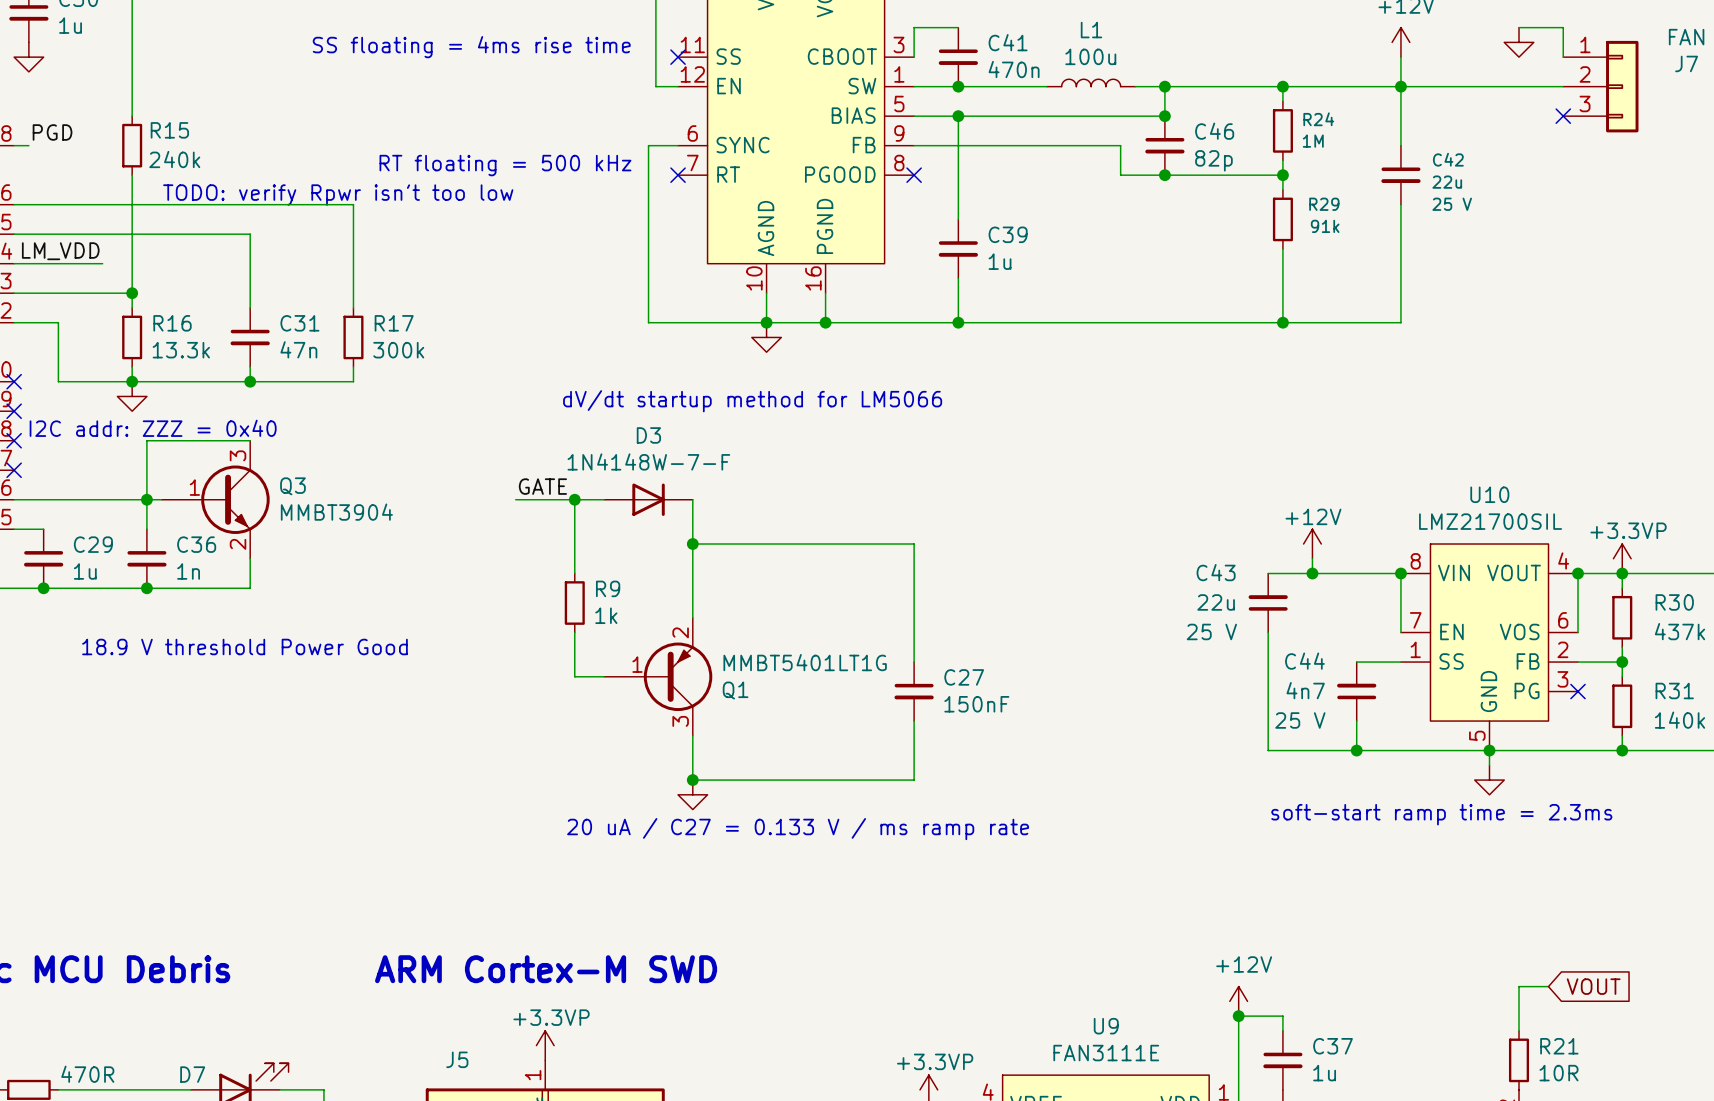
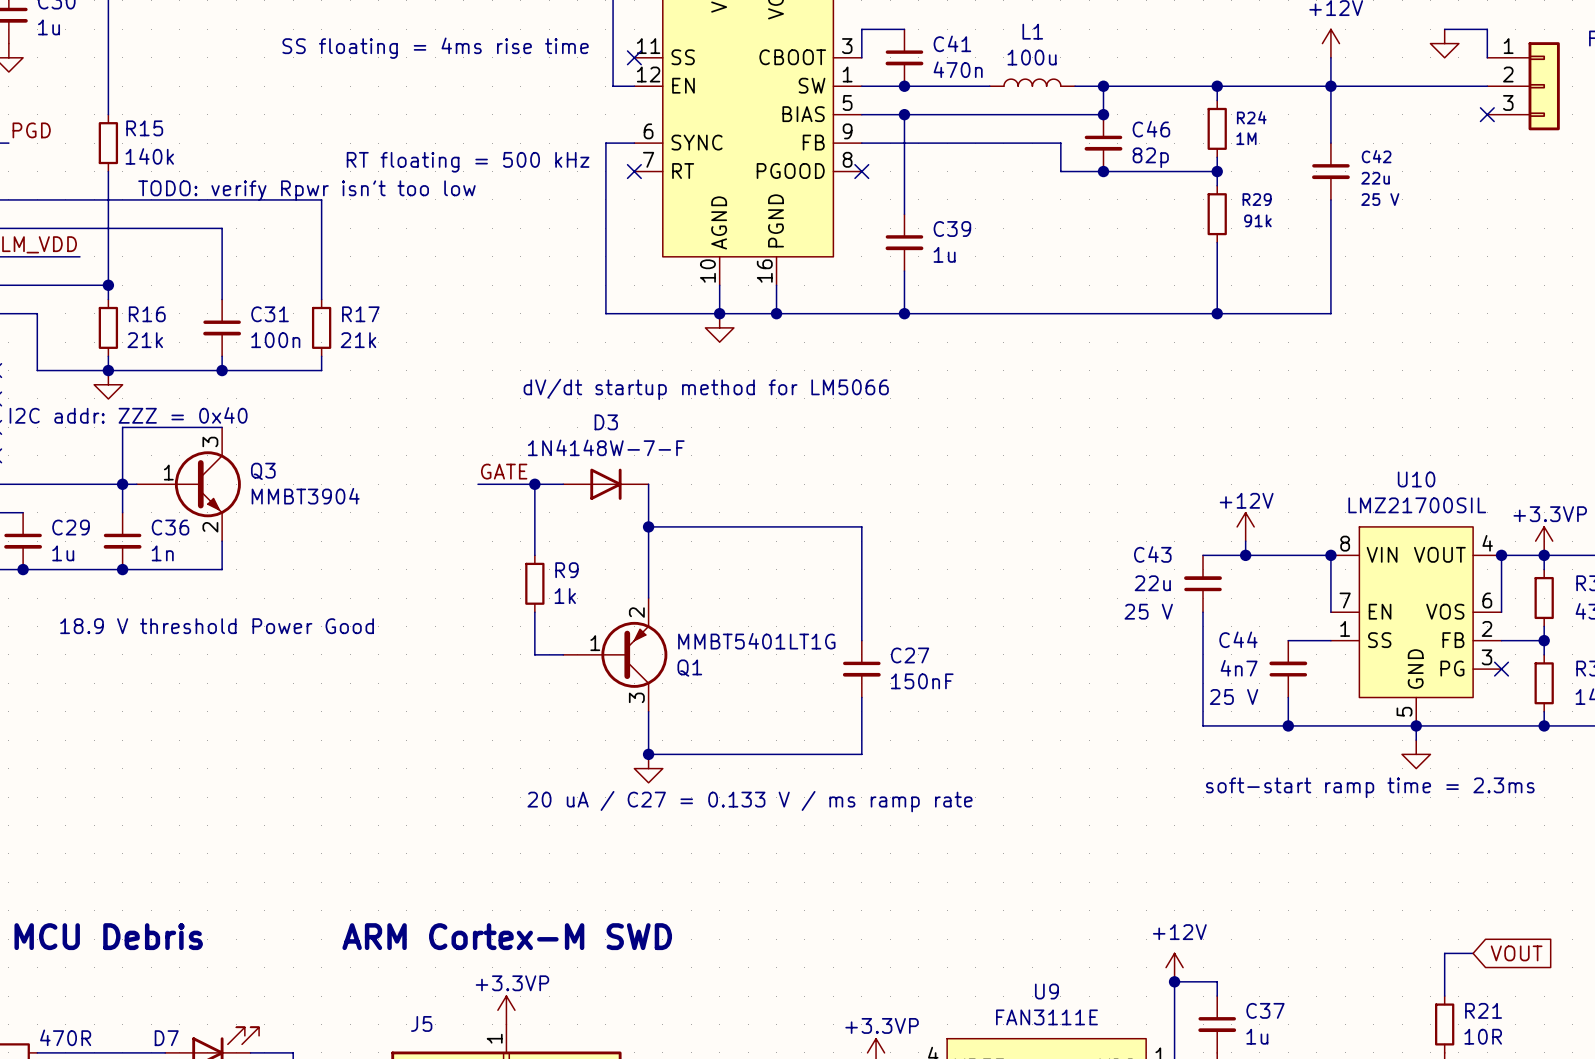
R15 value: 240k (174, 159) -> 140k (149, 156)
C31 value: 47n (298, 349) -> 100n (275, 340)
R16 value: 13.3k (181, 350) -> 21k (145, 340)
R17 value: 300k (398, 350) -> 21k (358, 340)

